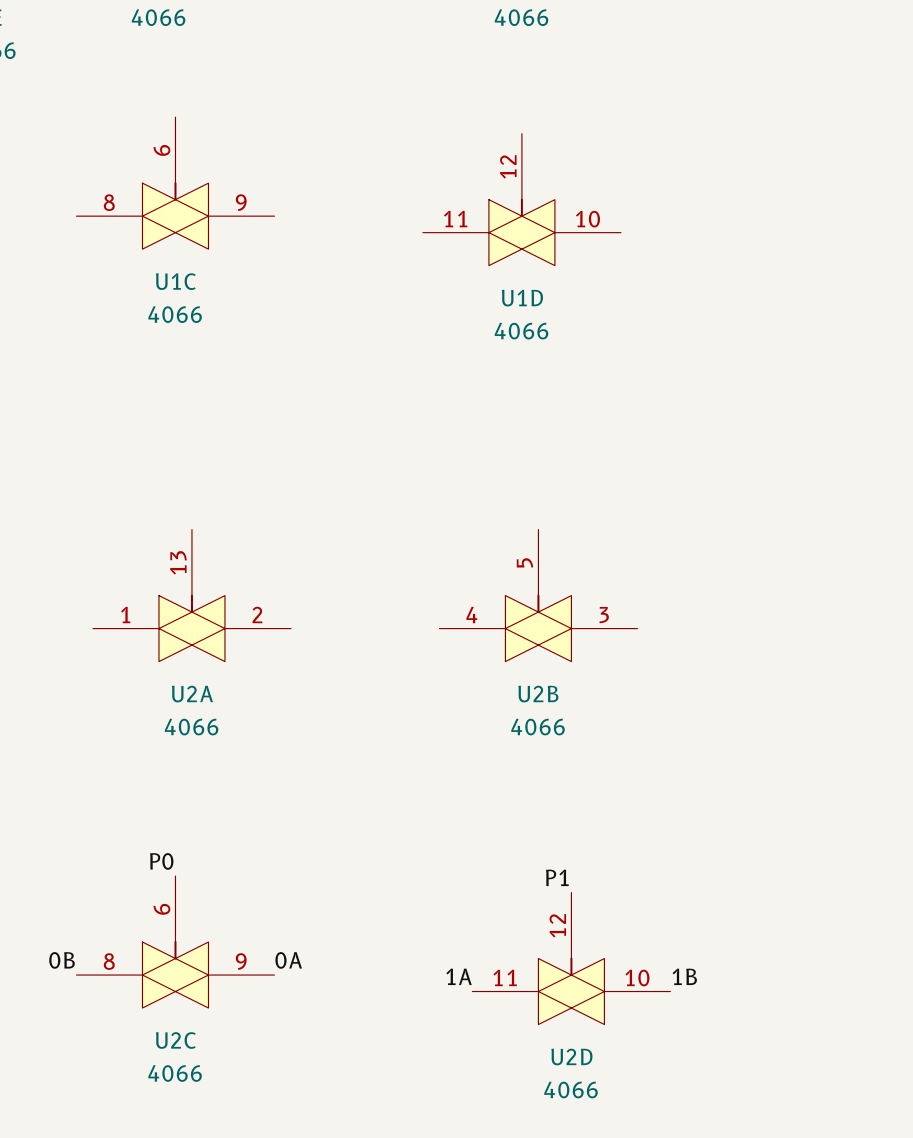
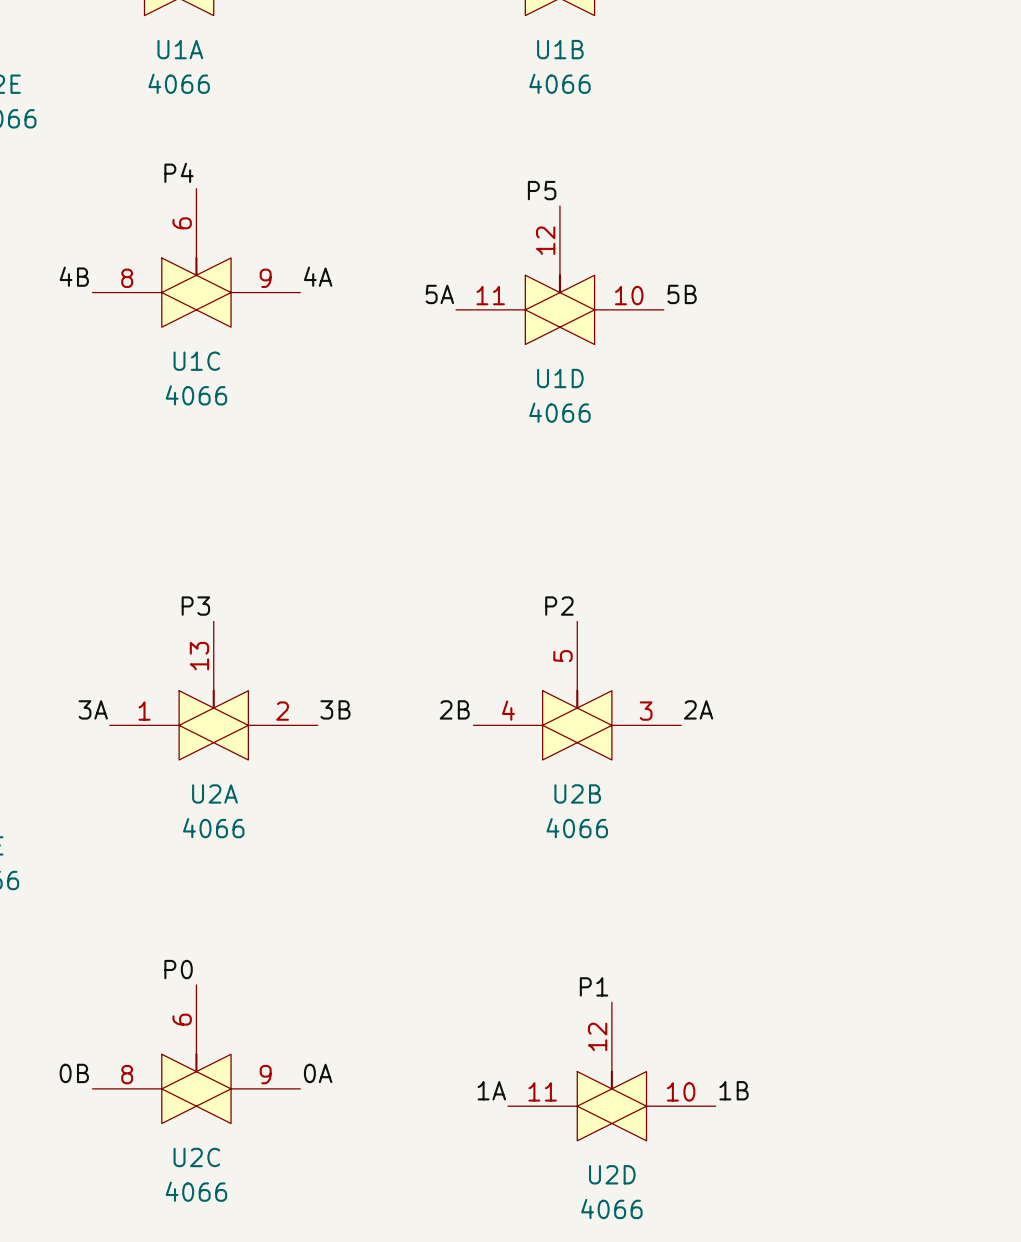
label: none -> P4 (178, 172)
label: none -> P5 (542, 190)
label: none -> 4B (74, 276)
label: none -> 4A (318, 276)
label: none -> 5A (439, 294)
label: none -> 5B (682, 294)
label: none -> P3 (195, 606)
label: none -> P2 (559, 606)
label: none -> 3A (93, 709)
label: none -> 3B (335, 709)
label: none -> 2B (454, 709)
label: none -> 2A (698, 709)

